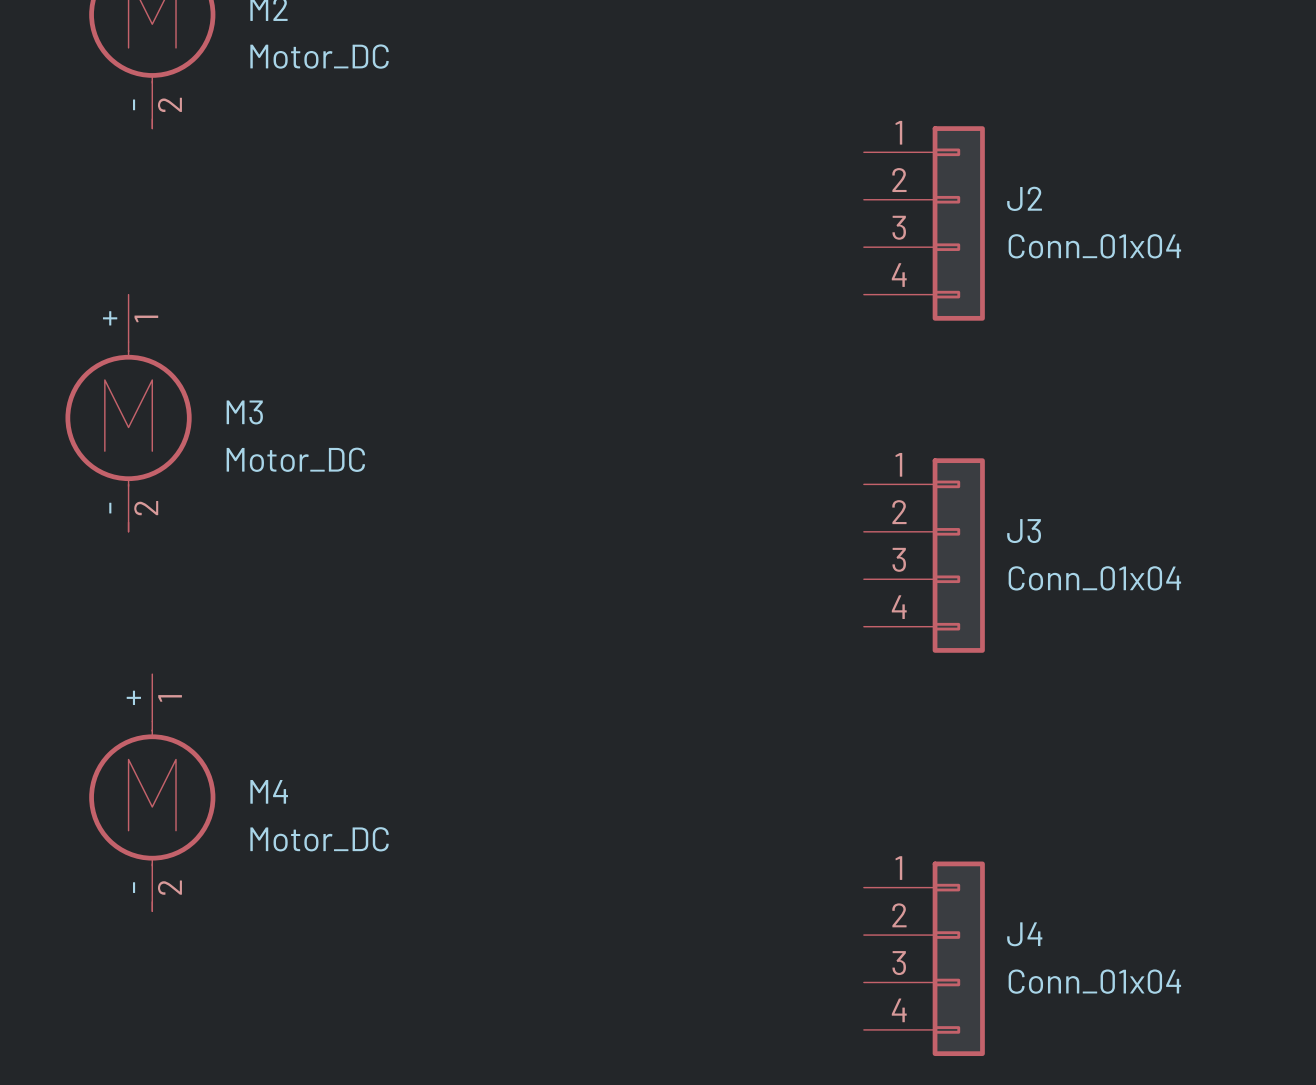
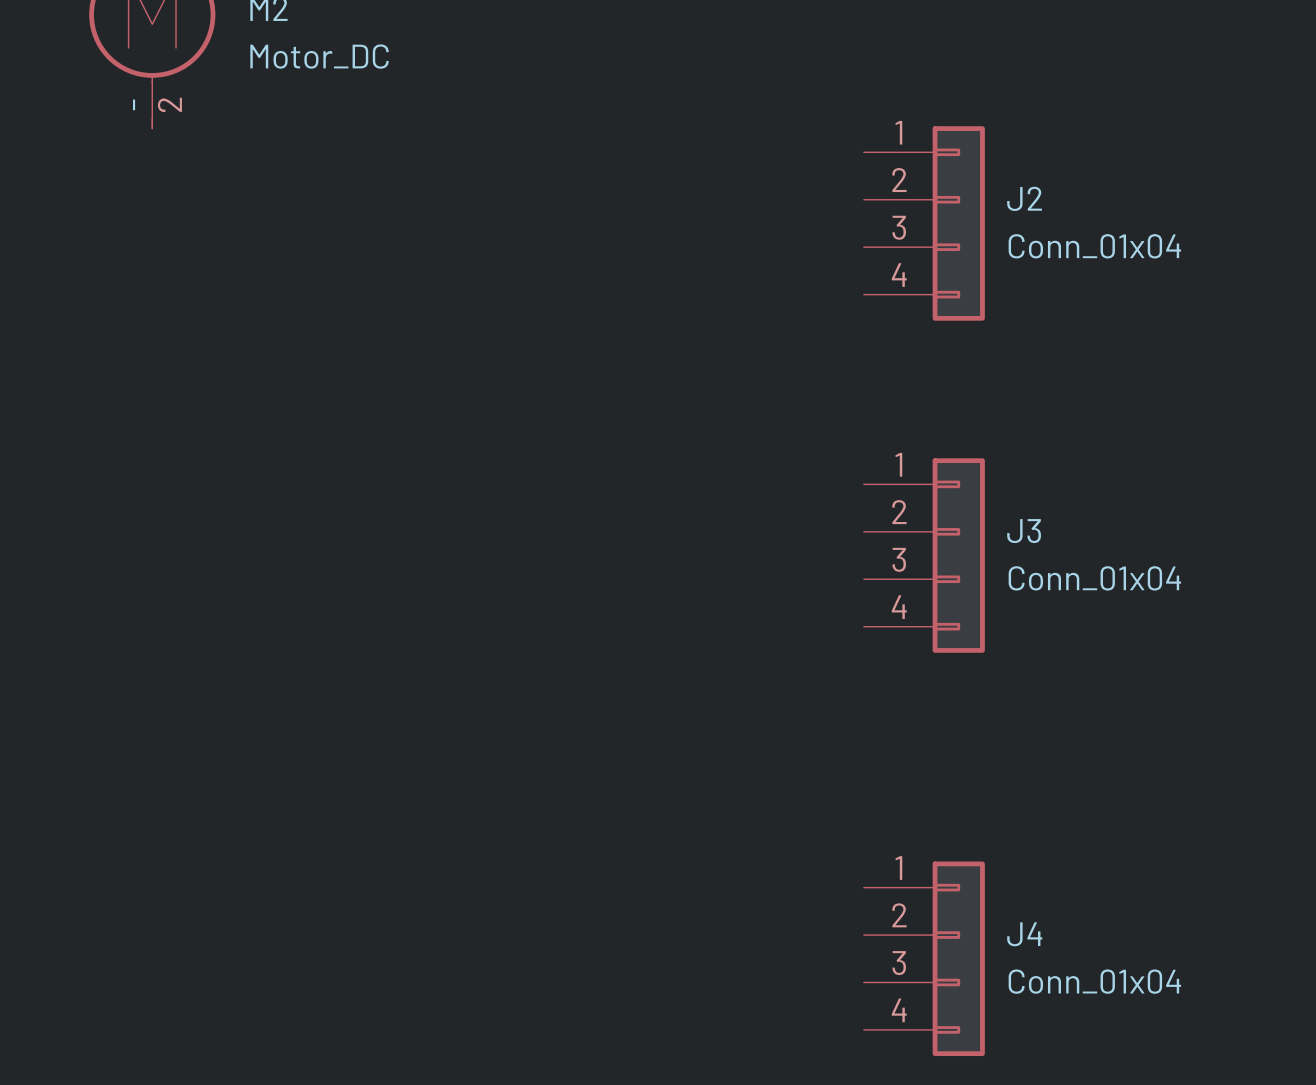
M3: Motor_DC (128, 413) -> none
M4: Motor_DC (152, 792) -> none

